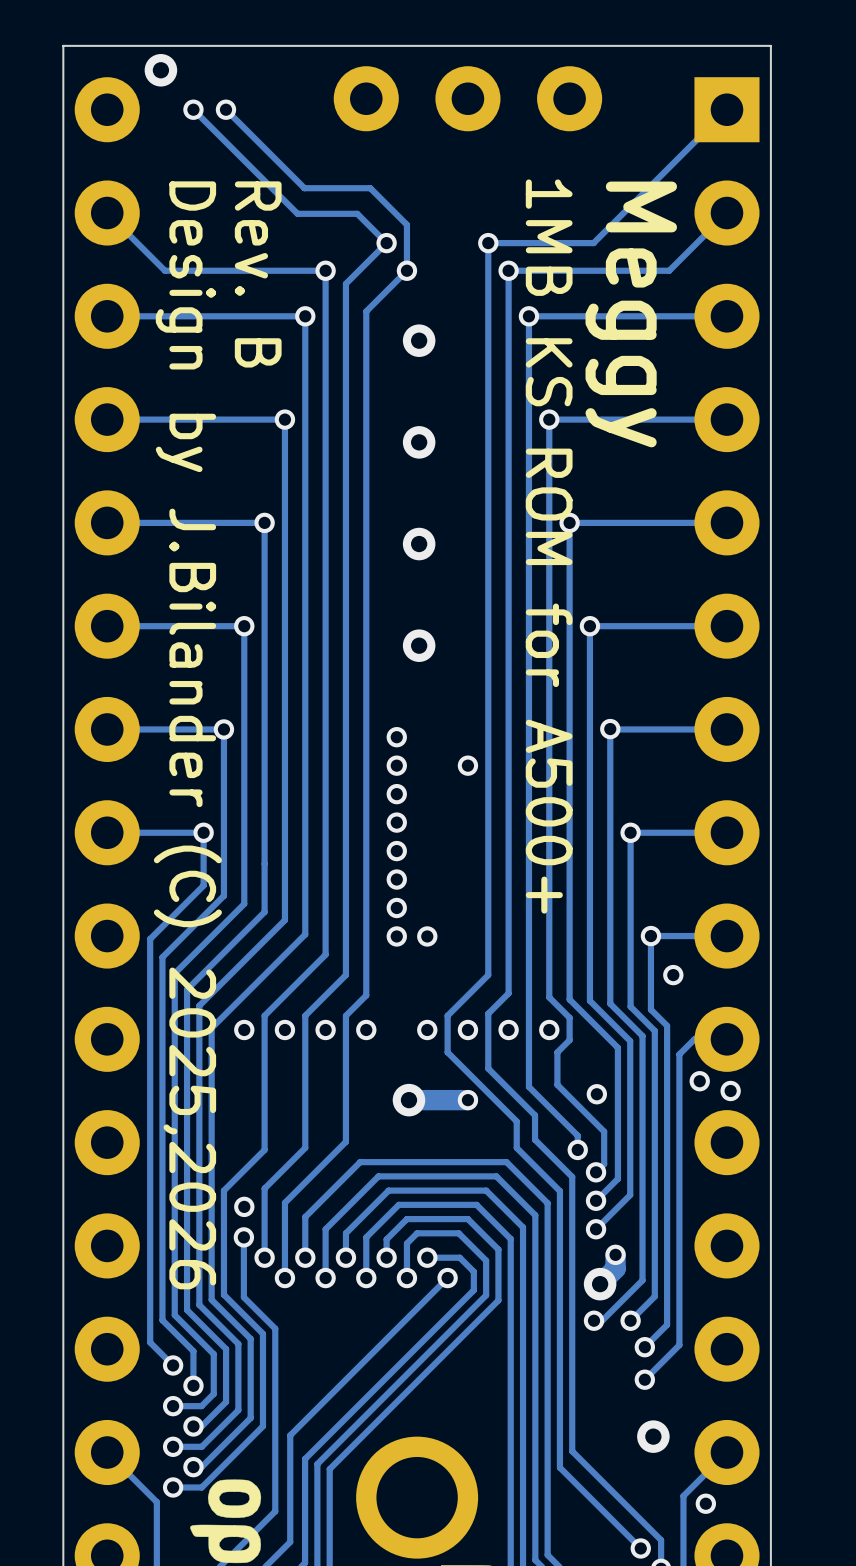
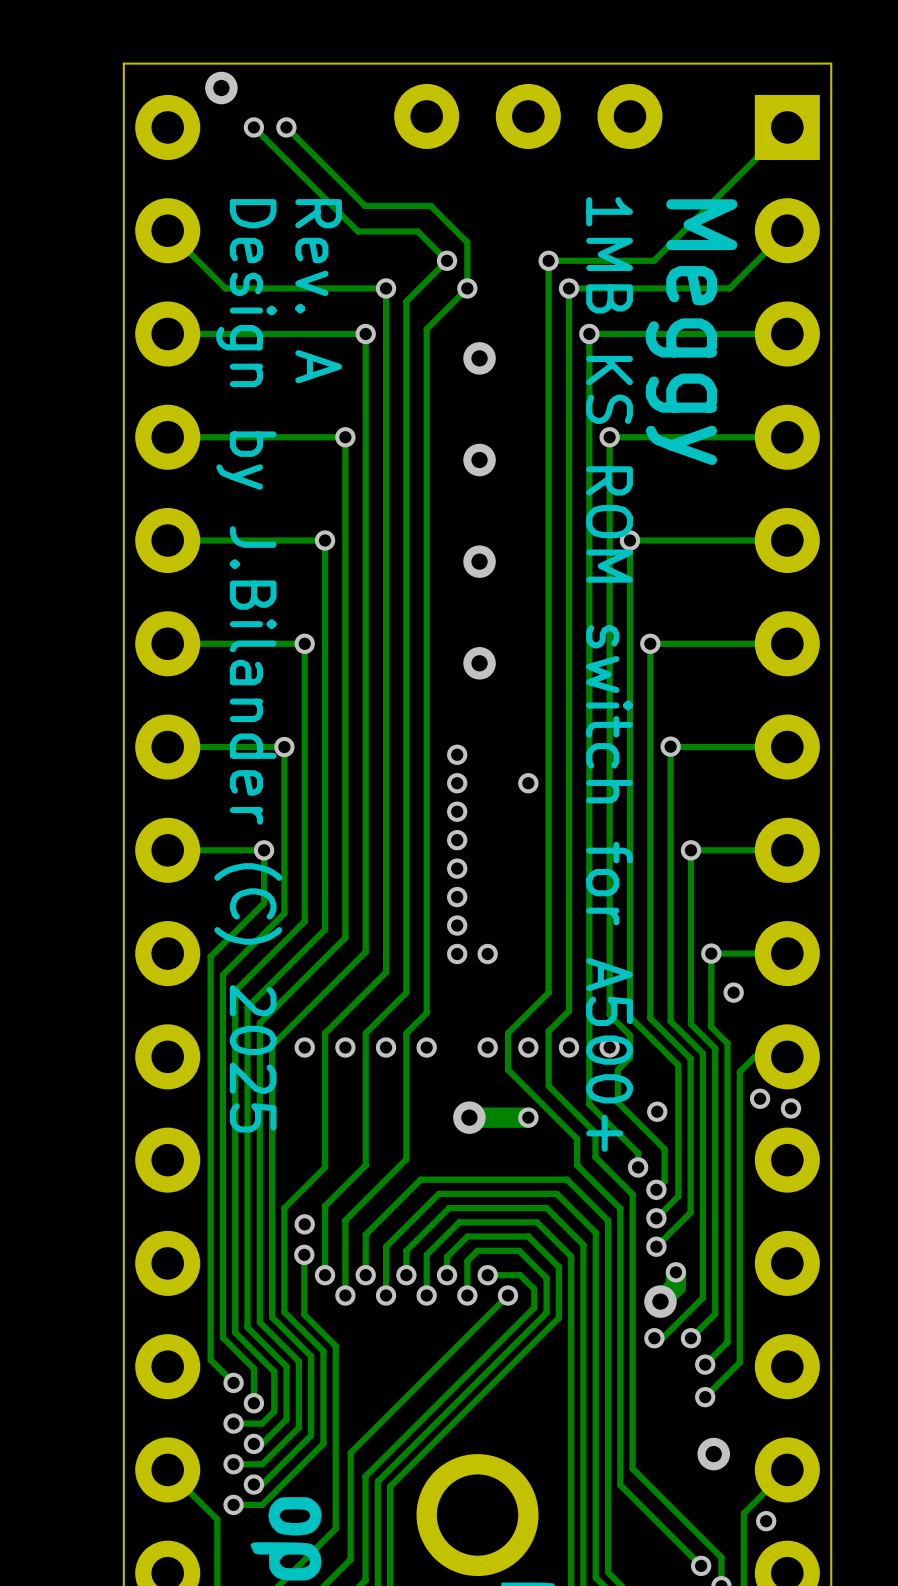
text: Rev. B (258, 274) -> Rev. A (318, 291)
text: 1MB KS ROM for A500+ (549, 546) -> 1MB KS ROM switch for A500+ (609, 674)
text: Design by J.Bilander (C) 2025,2026 (187, 735) -> Design by J.Bilander (C) 2025 (248, 665)

